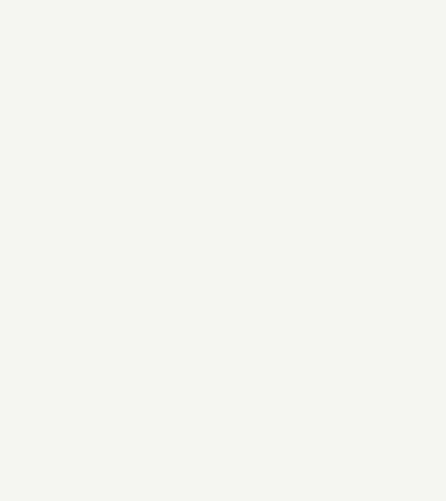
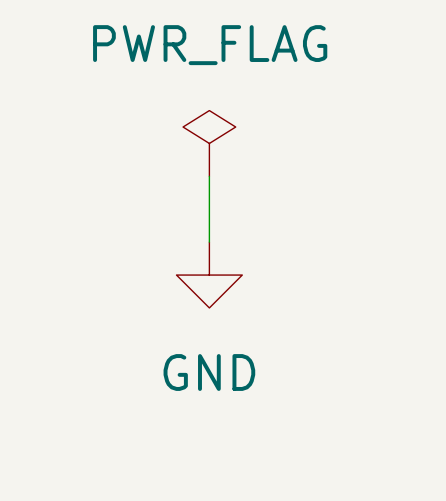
power symbol: none -> PWR_FLAG (209, 143)
wire: none -> (209, 176) (209, 242)
power symbol: none -> GND (209, 275)

